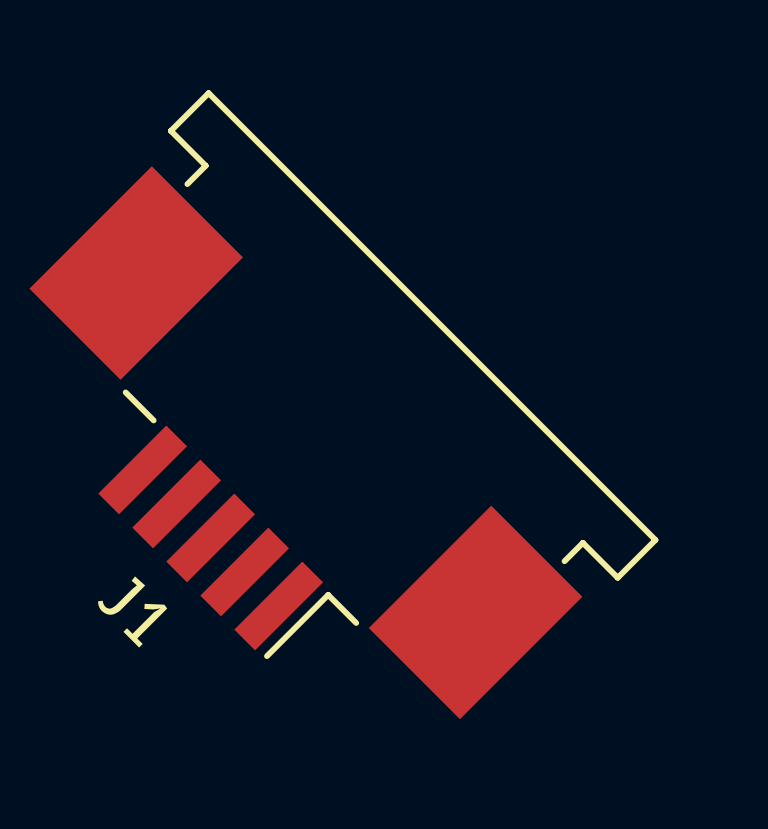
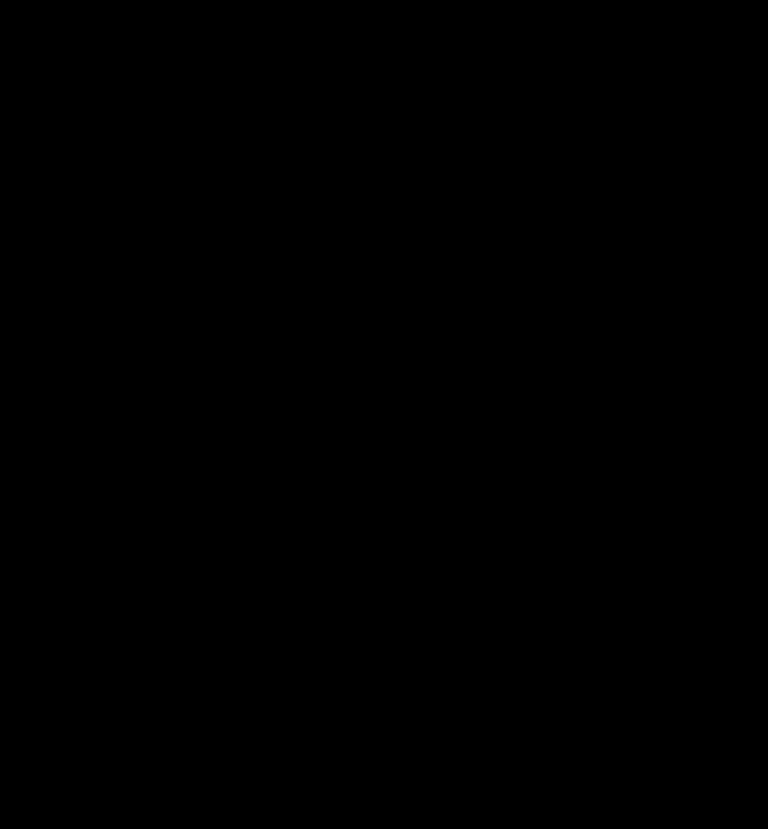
J1: (343, 404) -> none

